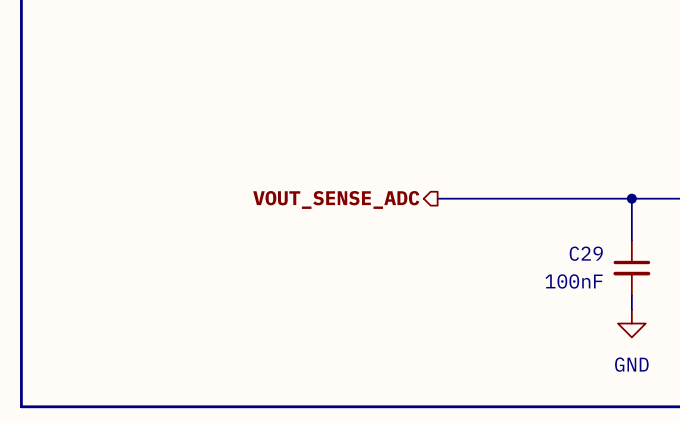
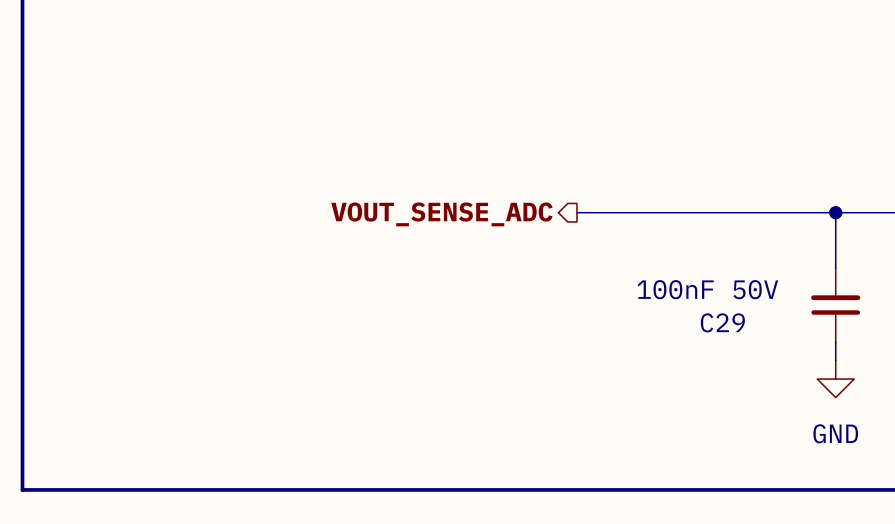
C29 name position: C29 (586, 253) -> C29 (722, 322)
C29 rotation: 0° (631, 268) -> 180° (835, 305)
C29 value: 100nF (574, 281) -> 100nF 50V (707, 289)

